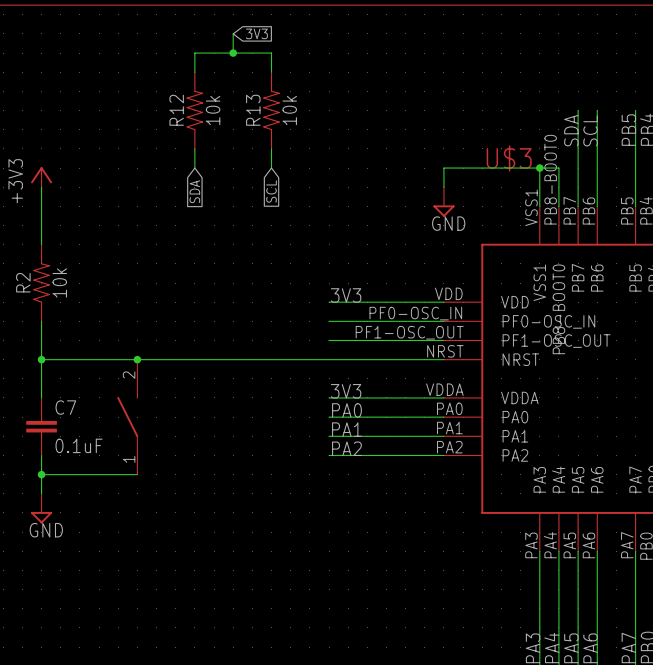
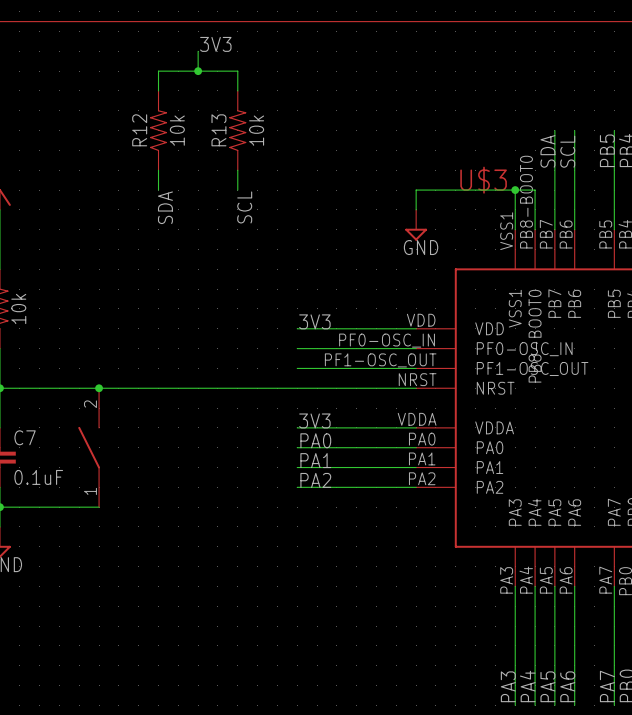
label: none -> 3V3 (215, 44)
global label: 3V3 (256, 33) -> none
label: none -> SCL (244, 207)
label: none -> SDA (165, 207)
global label: SDA (194, 191) -> none
global label: SCL (271, 191) -> none

